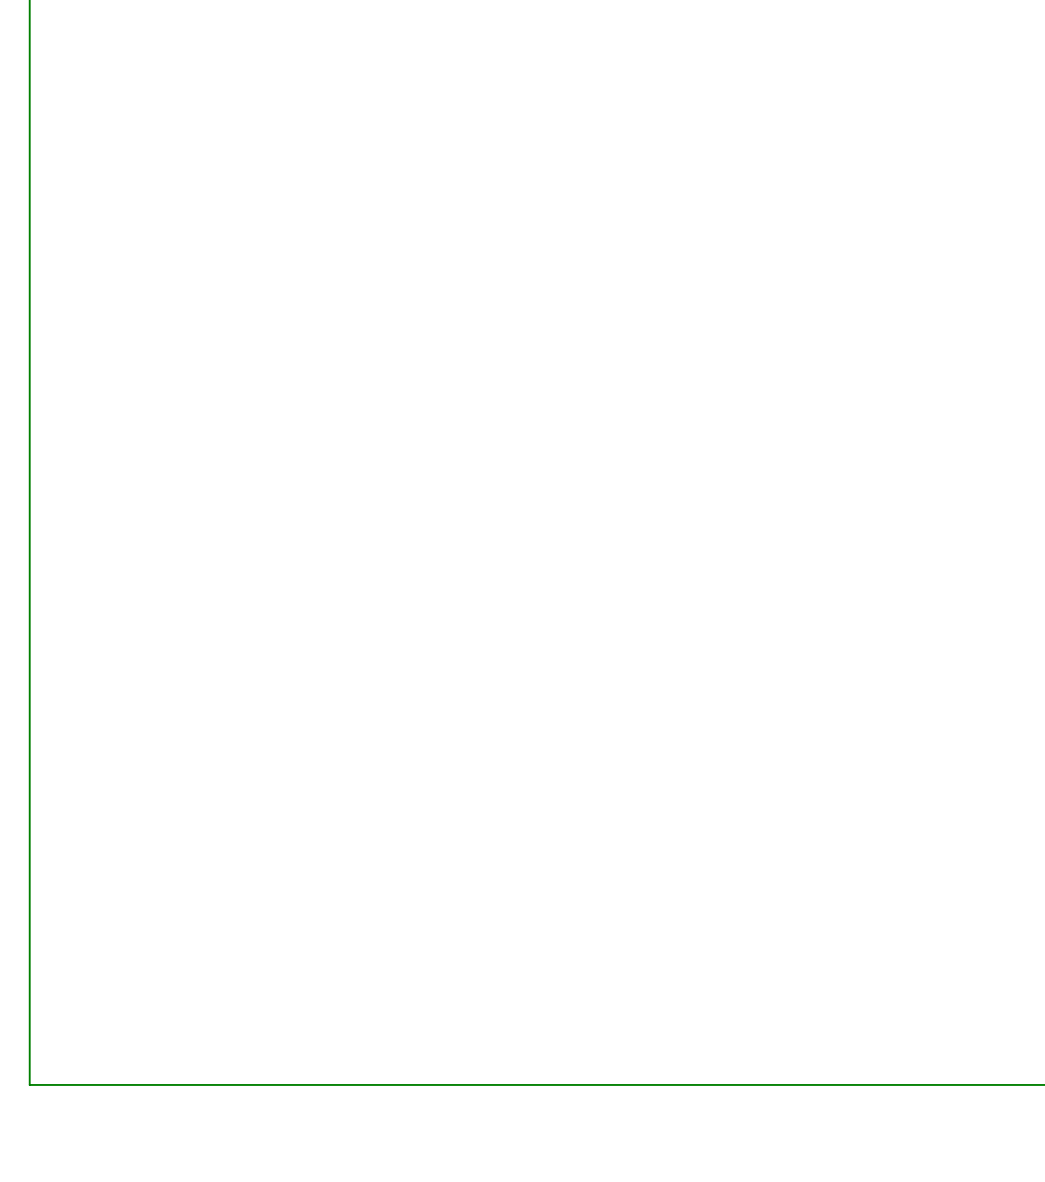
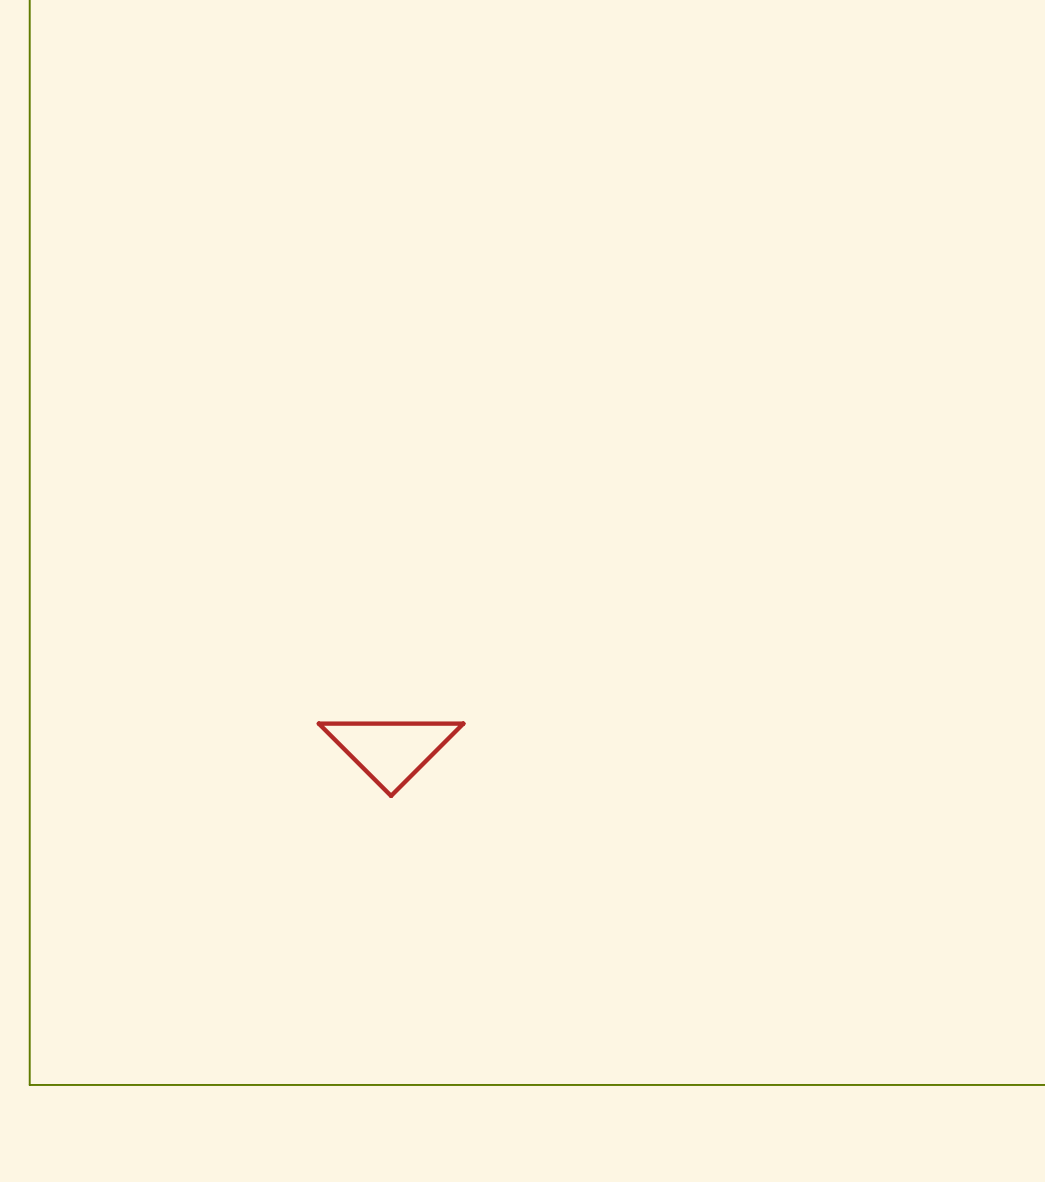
power symbol: none -> (391, 759)

